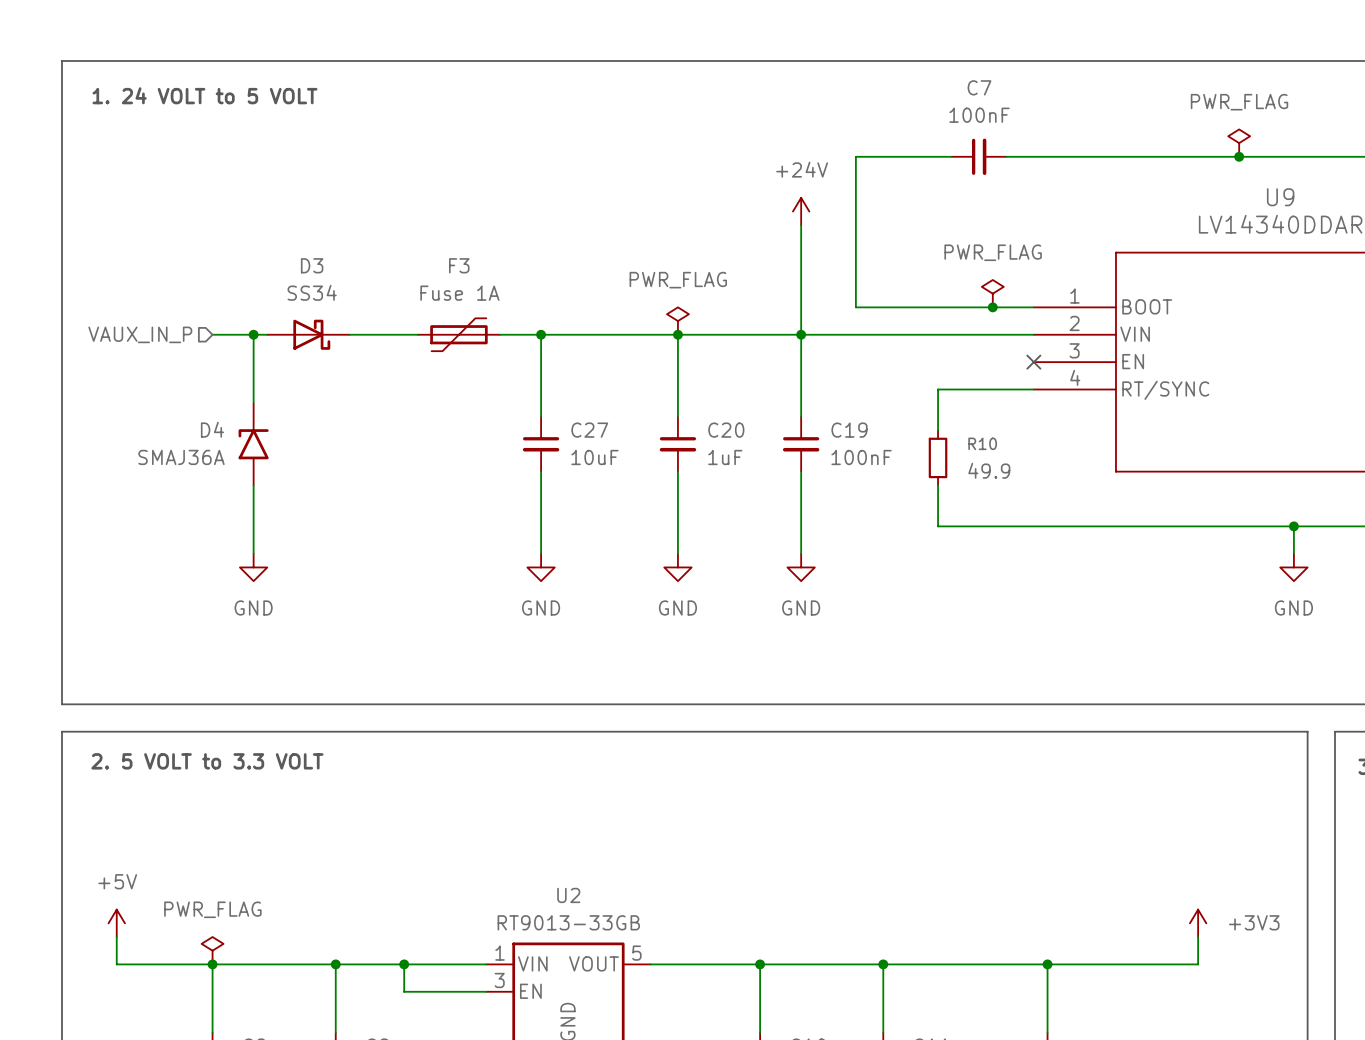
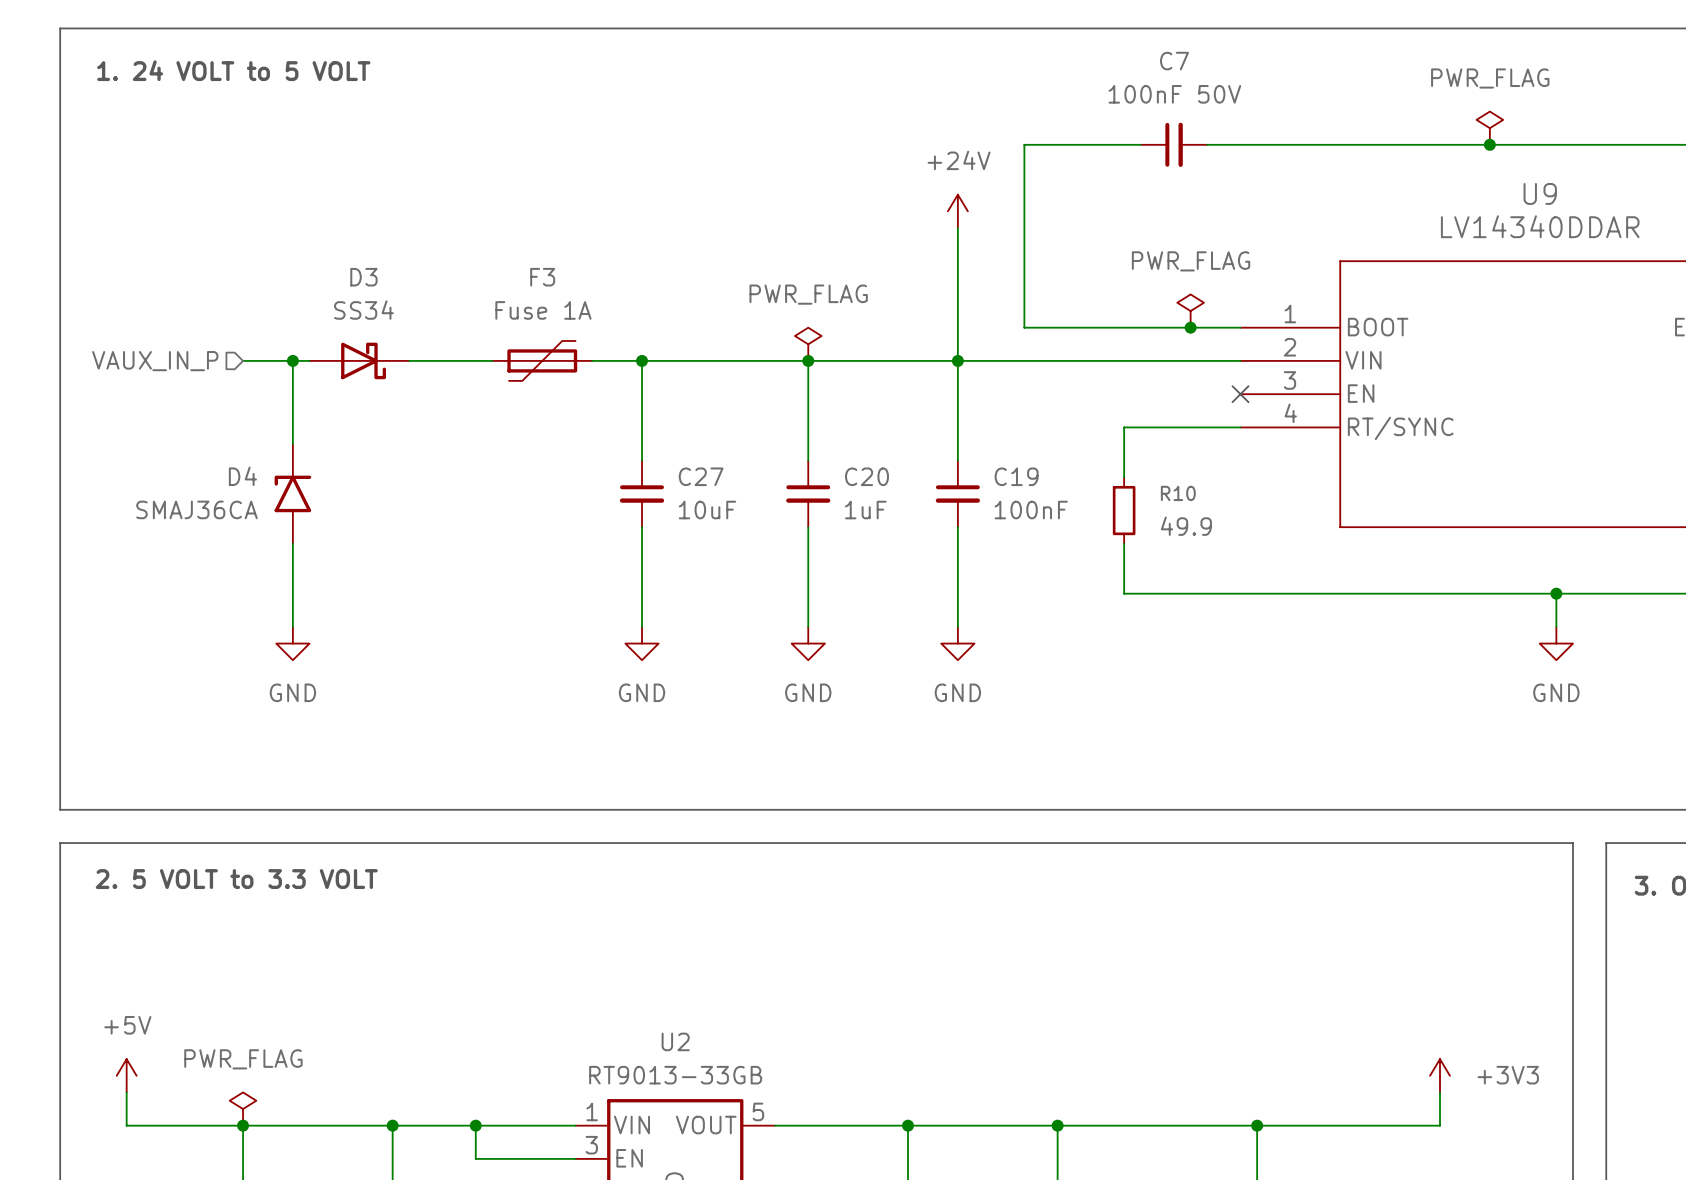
C7 value: 100nF (979, 115) -> 100nF 50V (1174, 94)
D4 value: SMAJ36A (181, 457) -> SMAJ36CA (196, 509)

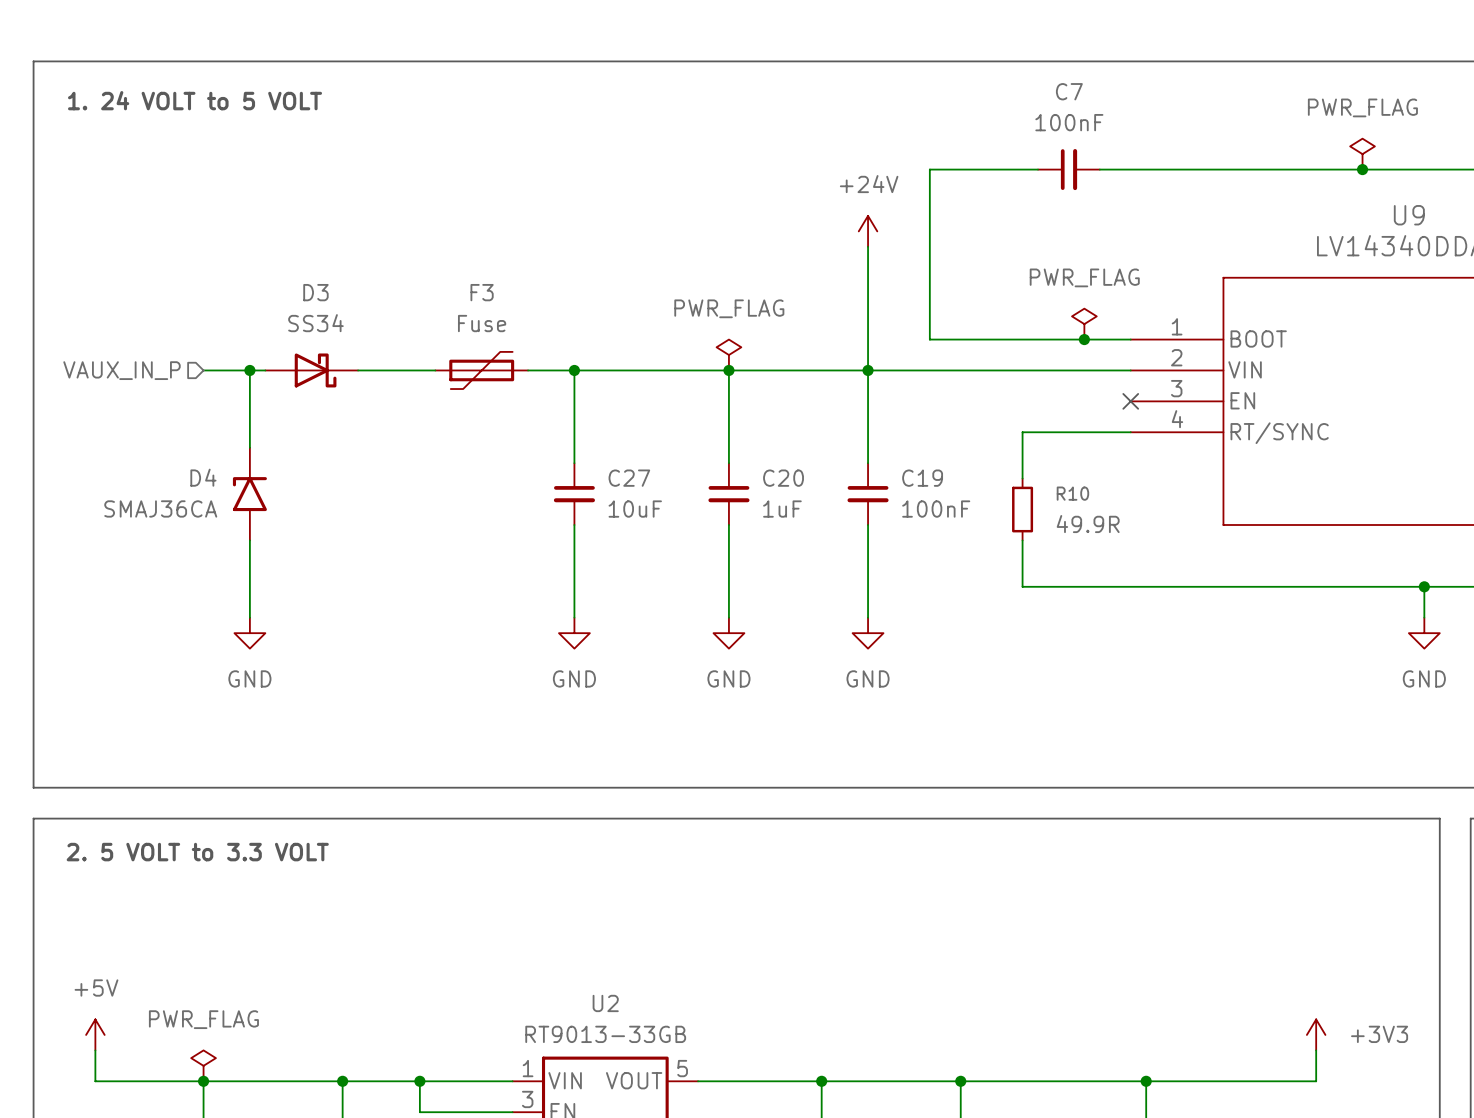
C7 value: 100nF 50V (1174, 94) -> 100nF (1069, 122)
F3 value: Fuse 1A (543, 310) -> Fuse (482, 323)
R10 value: 49.9 (1186, 526) -> 49.9R (1088, 524)

